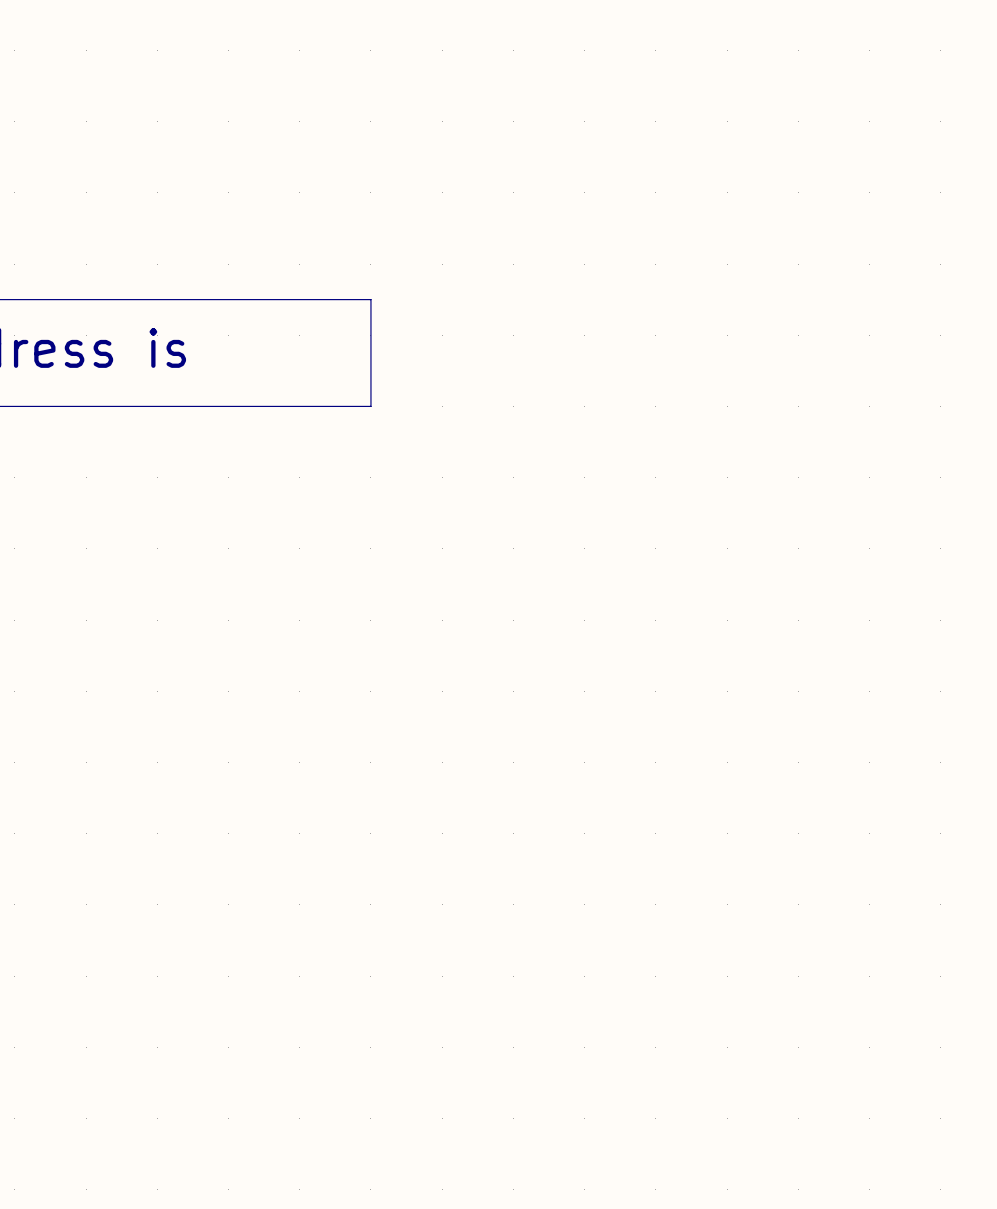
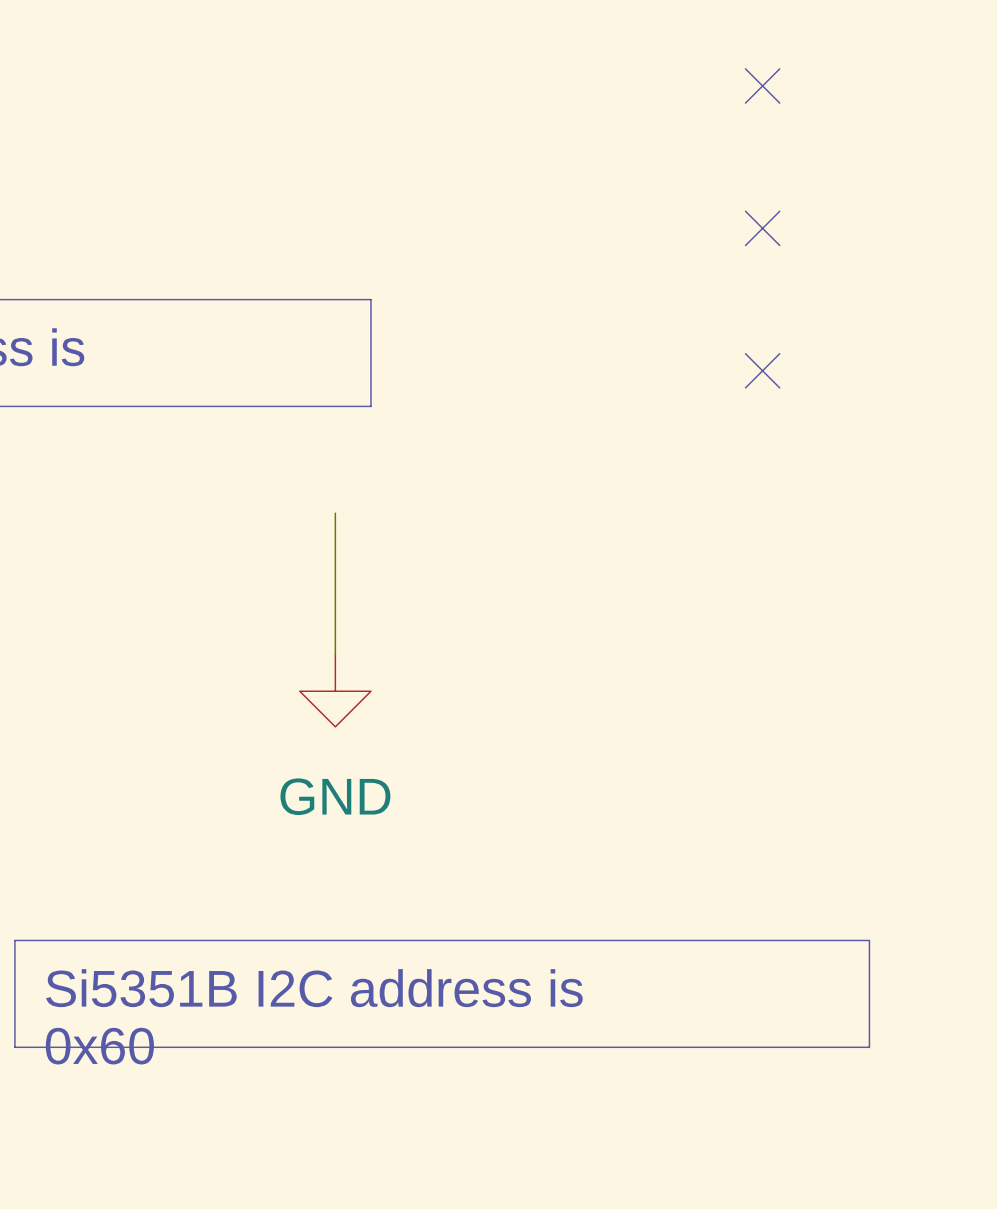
no-connect mark: none -> (762, 85)
no-connect mark: none -> (762, 228)
no-connect mark: none -> (762, 370)
wire: none -> (335, 513) (335, 655)
power symbol: none -> GND (335, 691)
line: none -> (14, 940) (869, 940) (869, 1047) (14, 1047) (14, 940)
text: none -> Si5351B I2C address is (314, 988)
text: none -> 0x60 (99, 1046)

